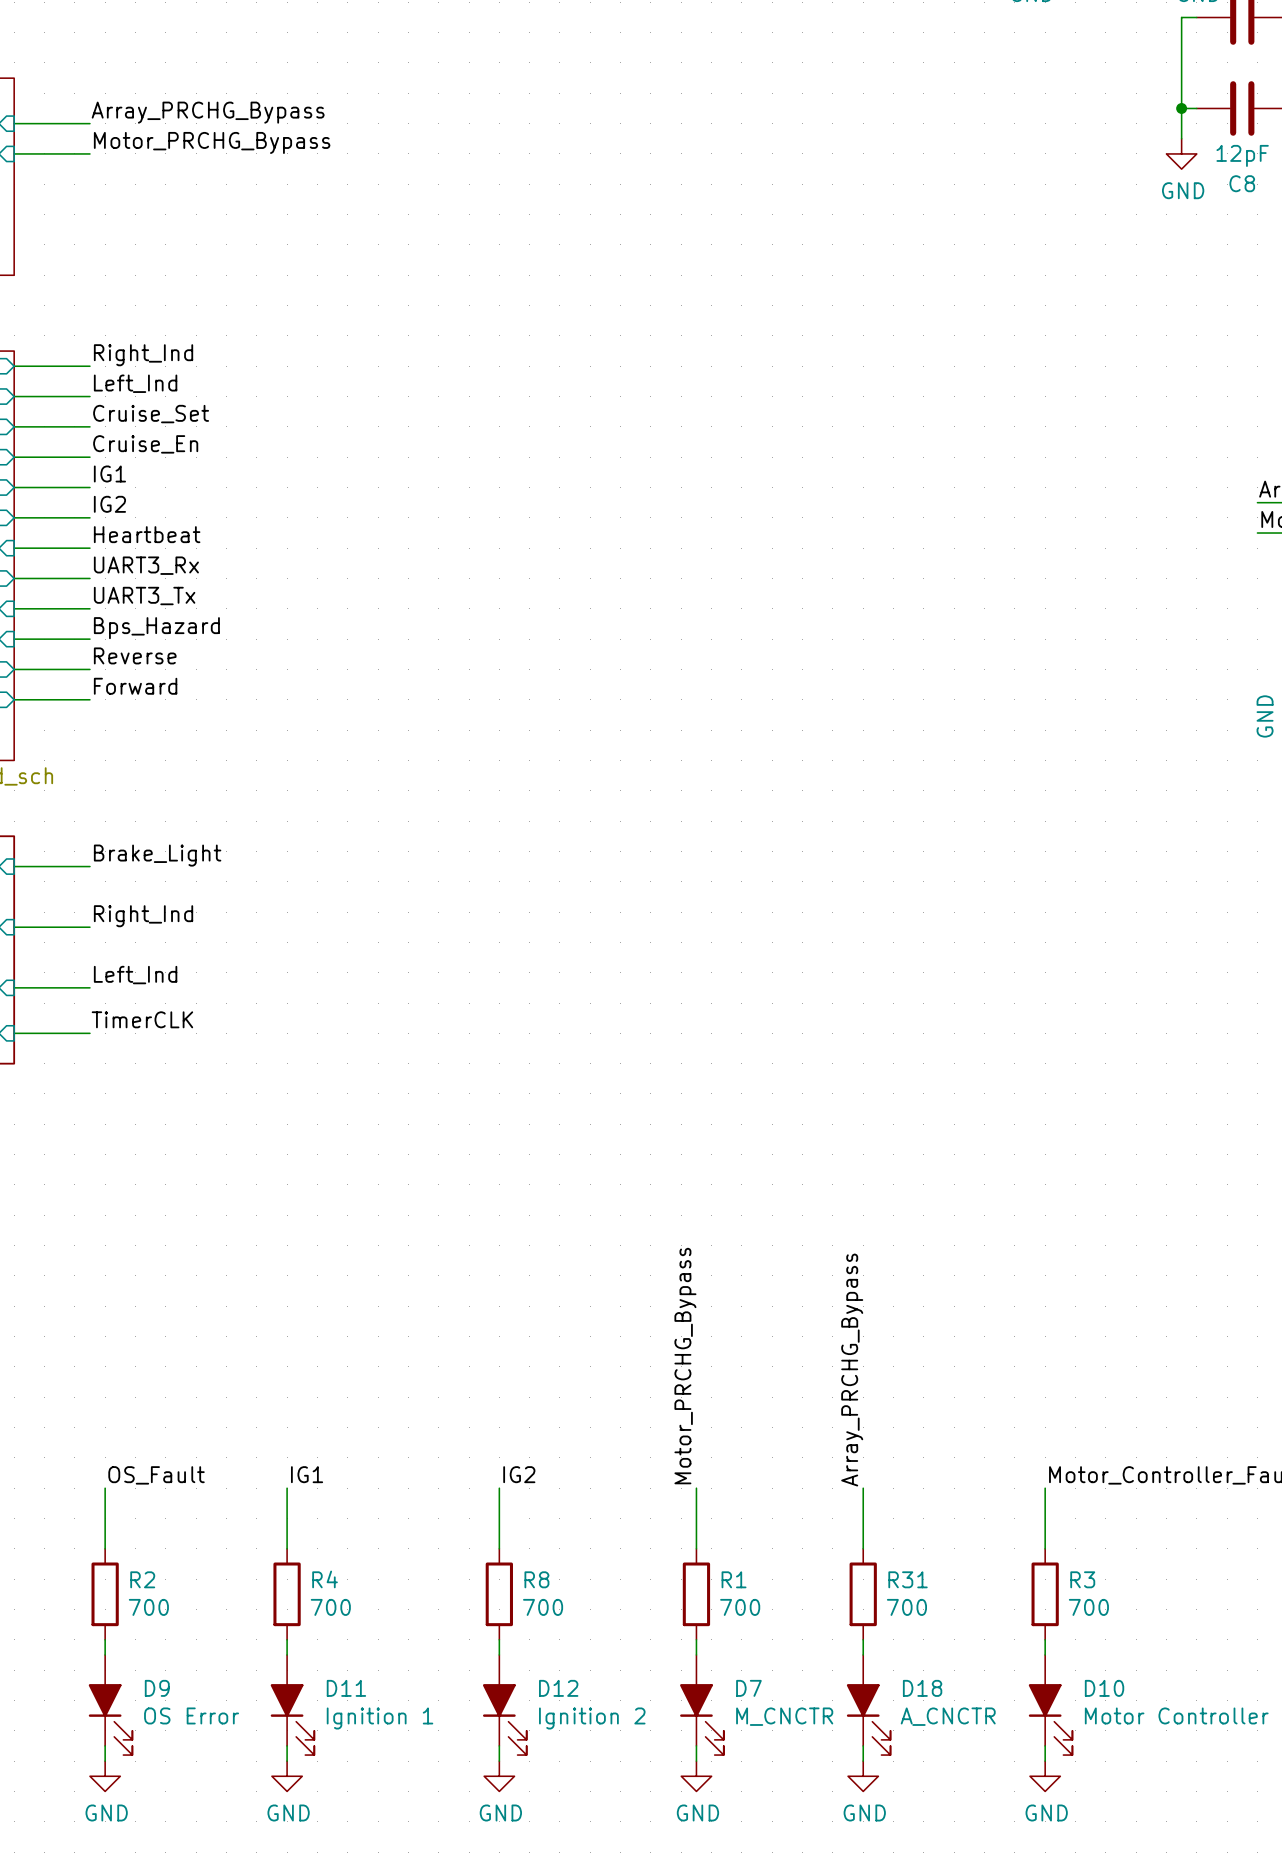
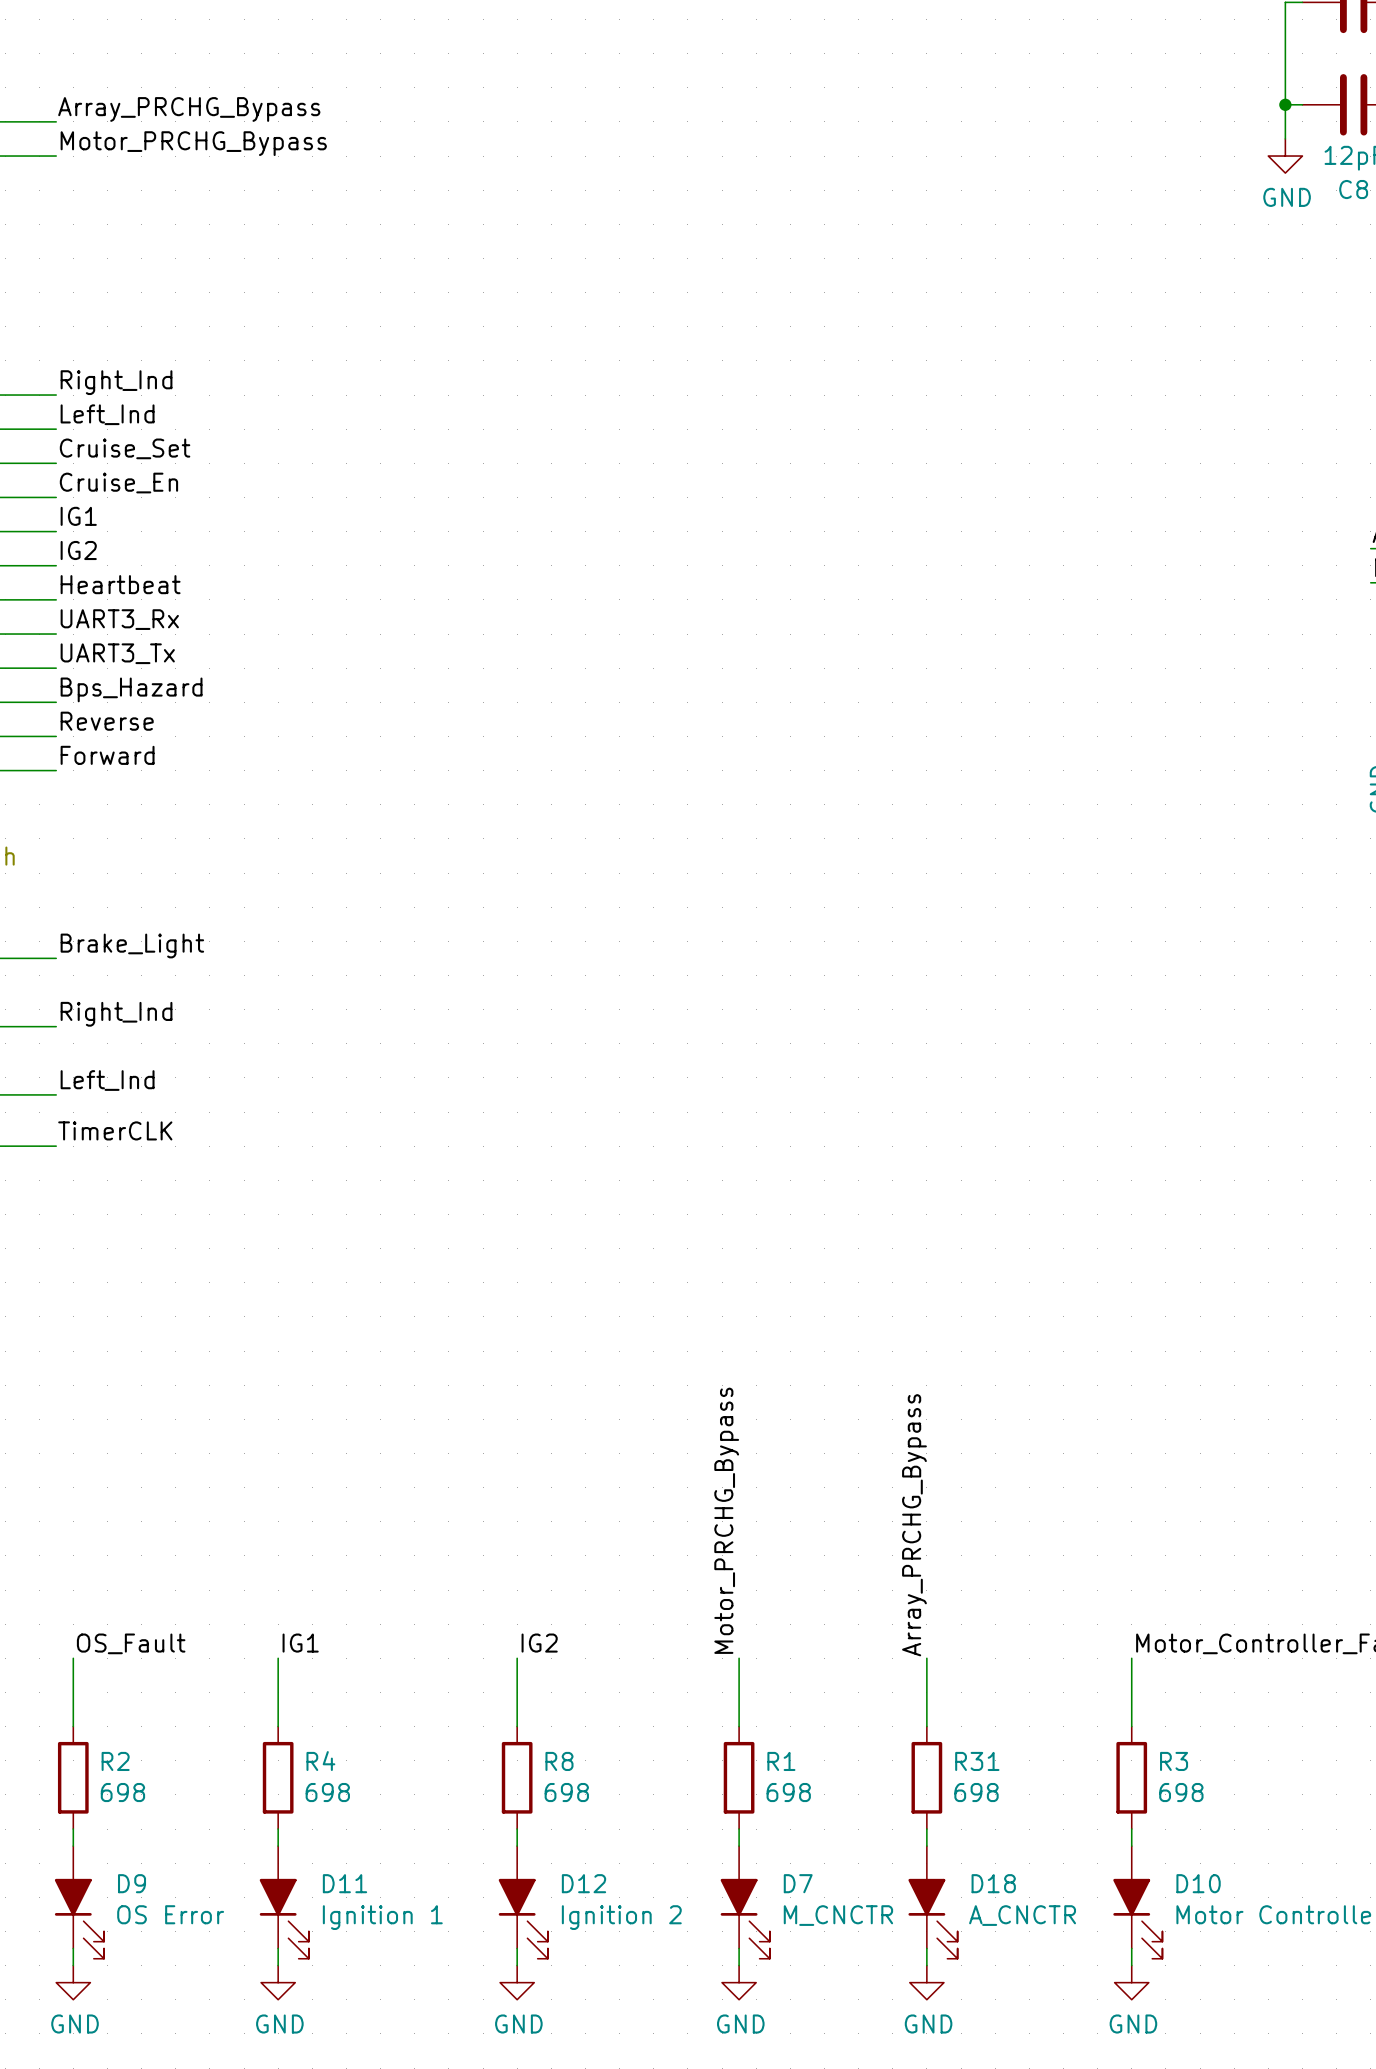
R2 value: 700 (148, 1607) -> 698 (122, 1792)
R4 value: 700 (330, 1607) -> 698 (327, 1792)
R8 value: 700 (543, 1607) -> 698 (566, 1792)
R1 value: 700 (740, 1607) -> 698 (788, 1792)
R31 value: 700 (906, 1607) -> 698 (976, 1792)
R3 value: 700 (1088, 1607) -> 698 (1181, 1792)

